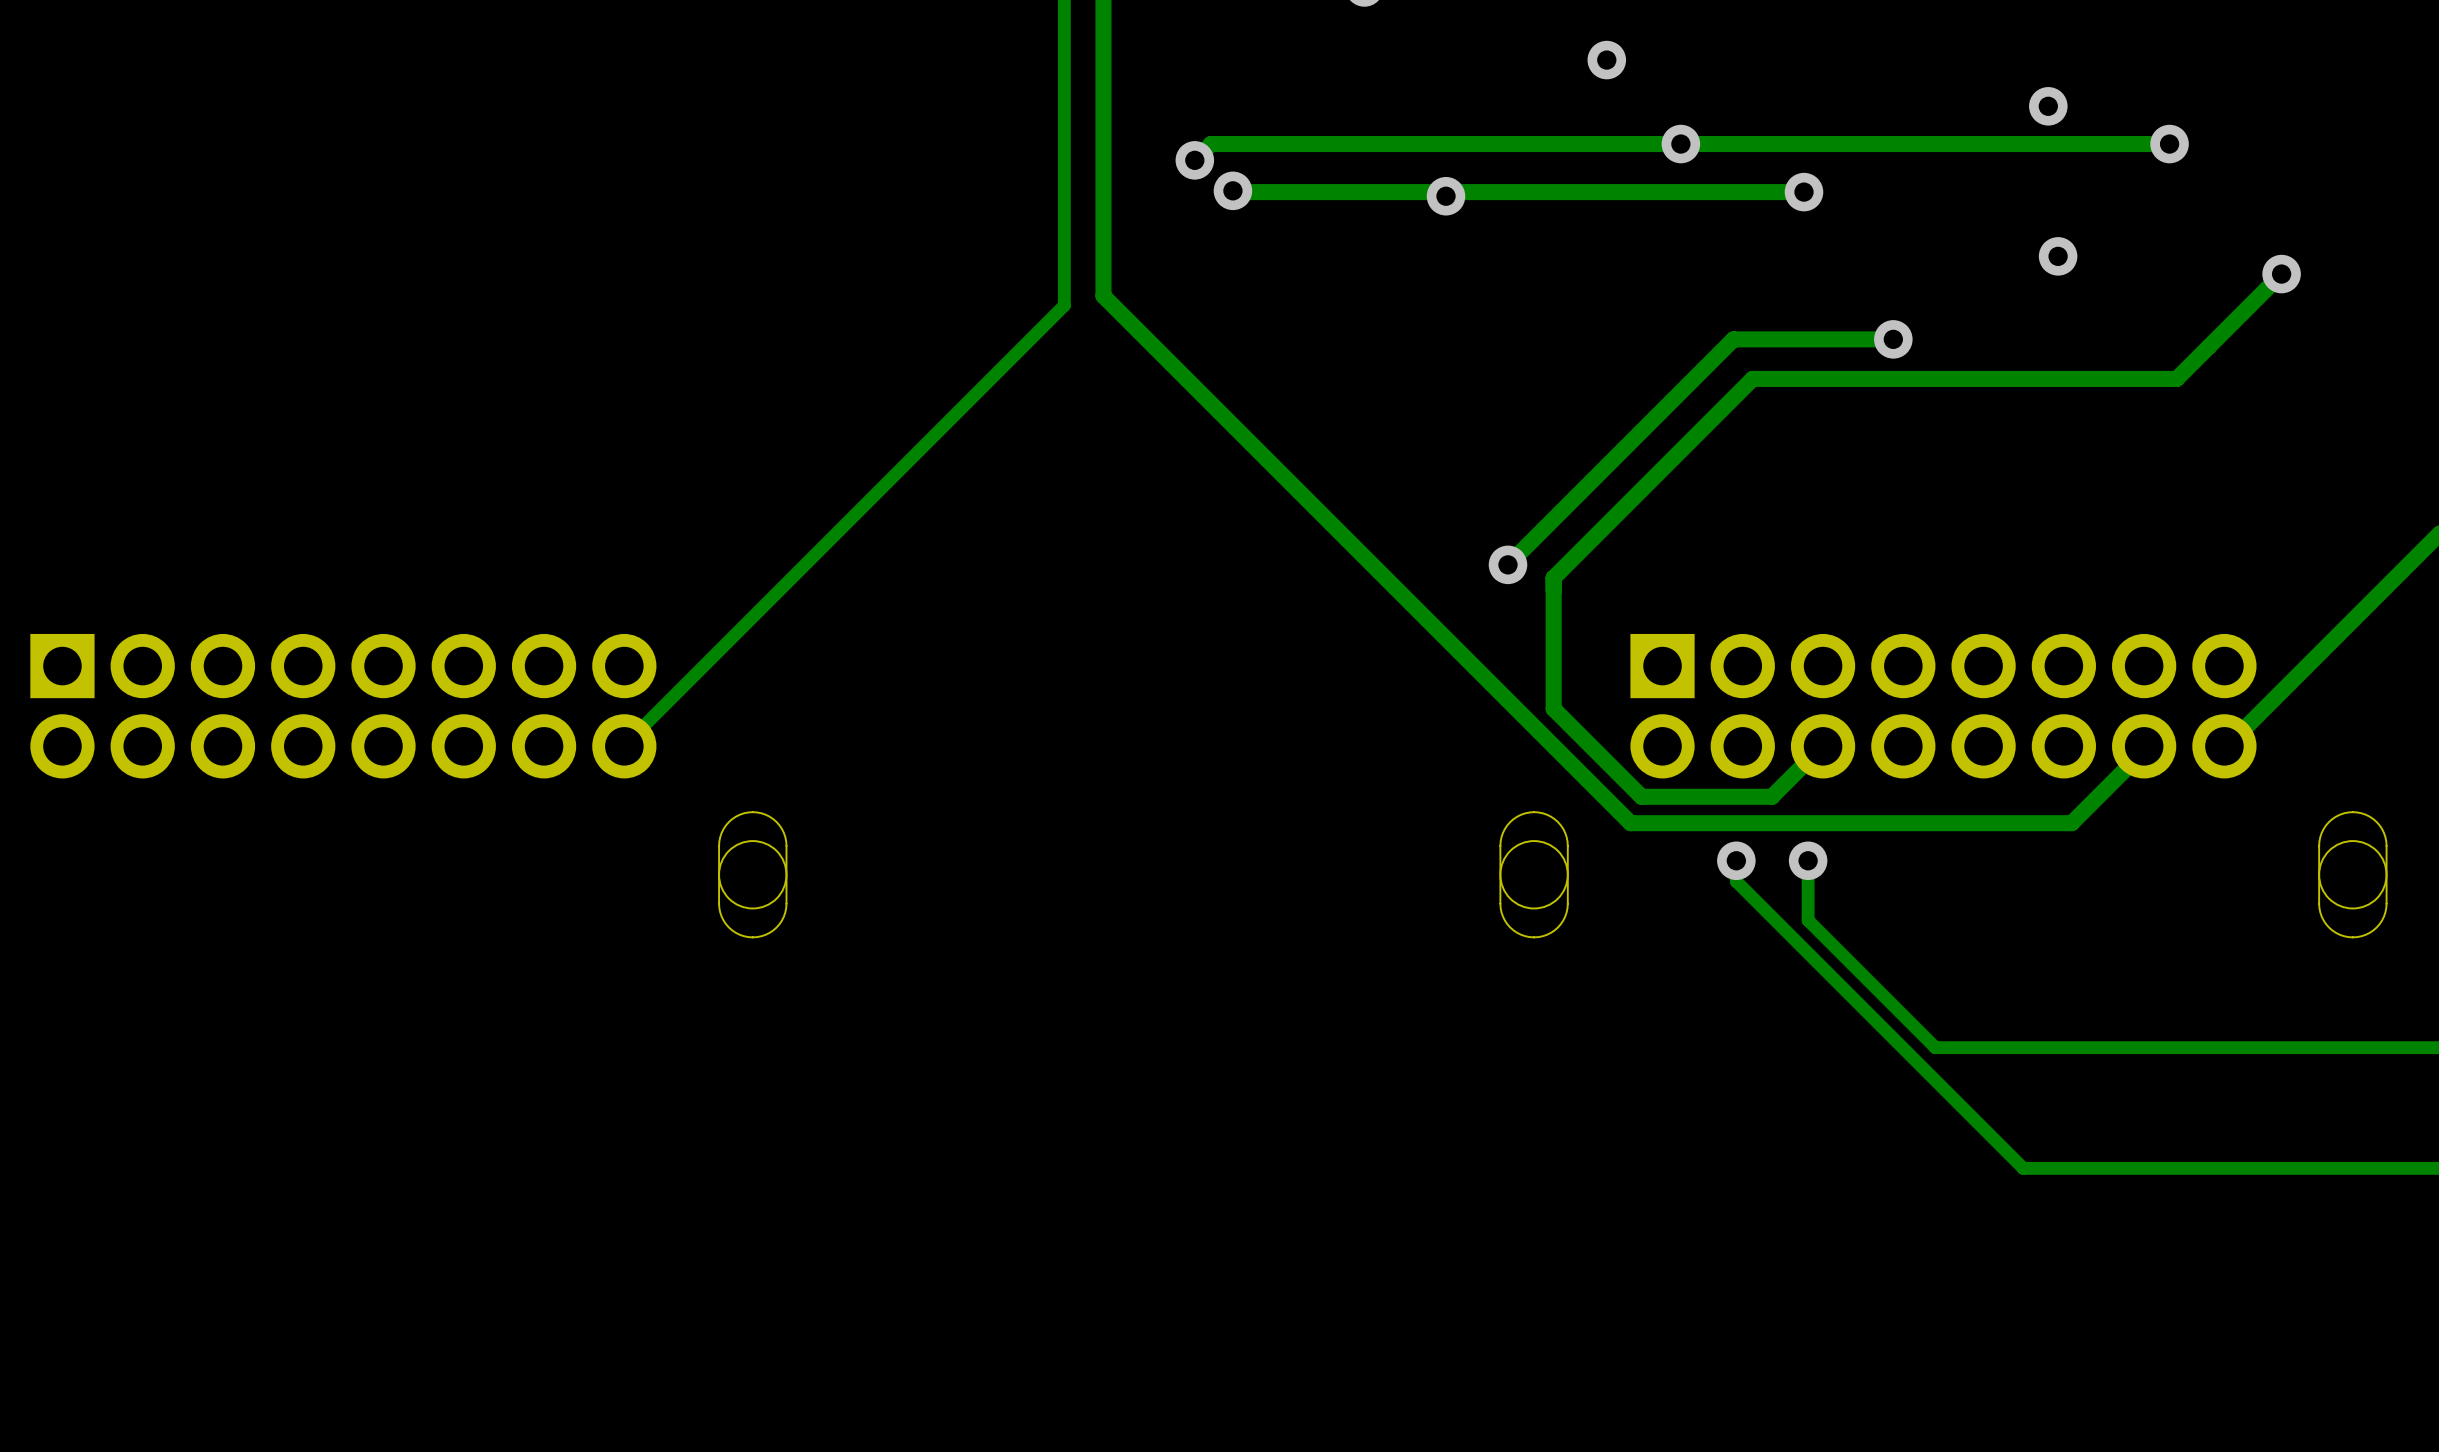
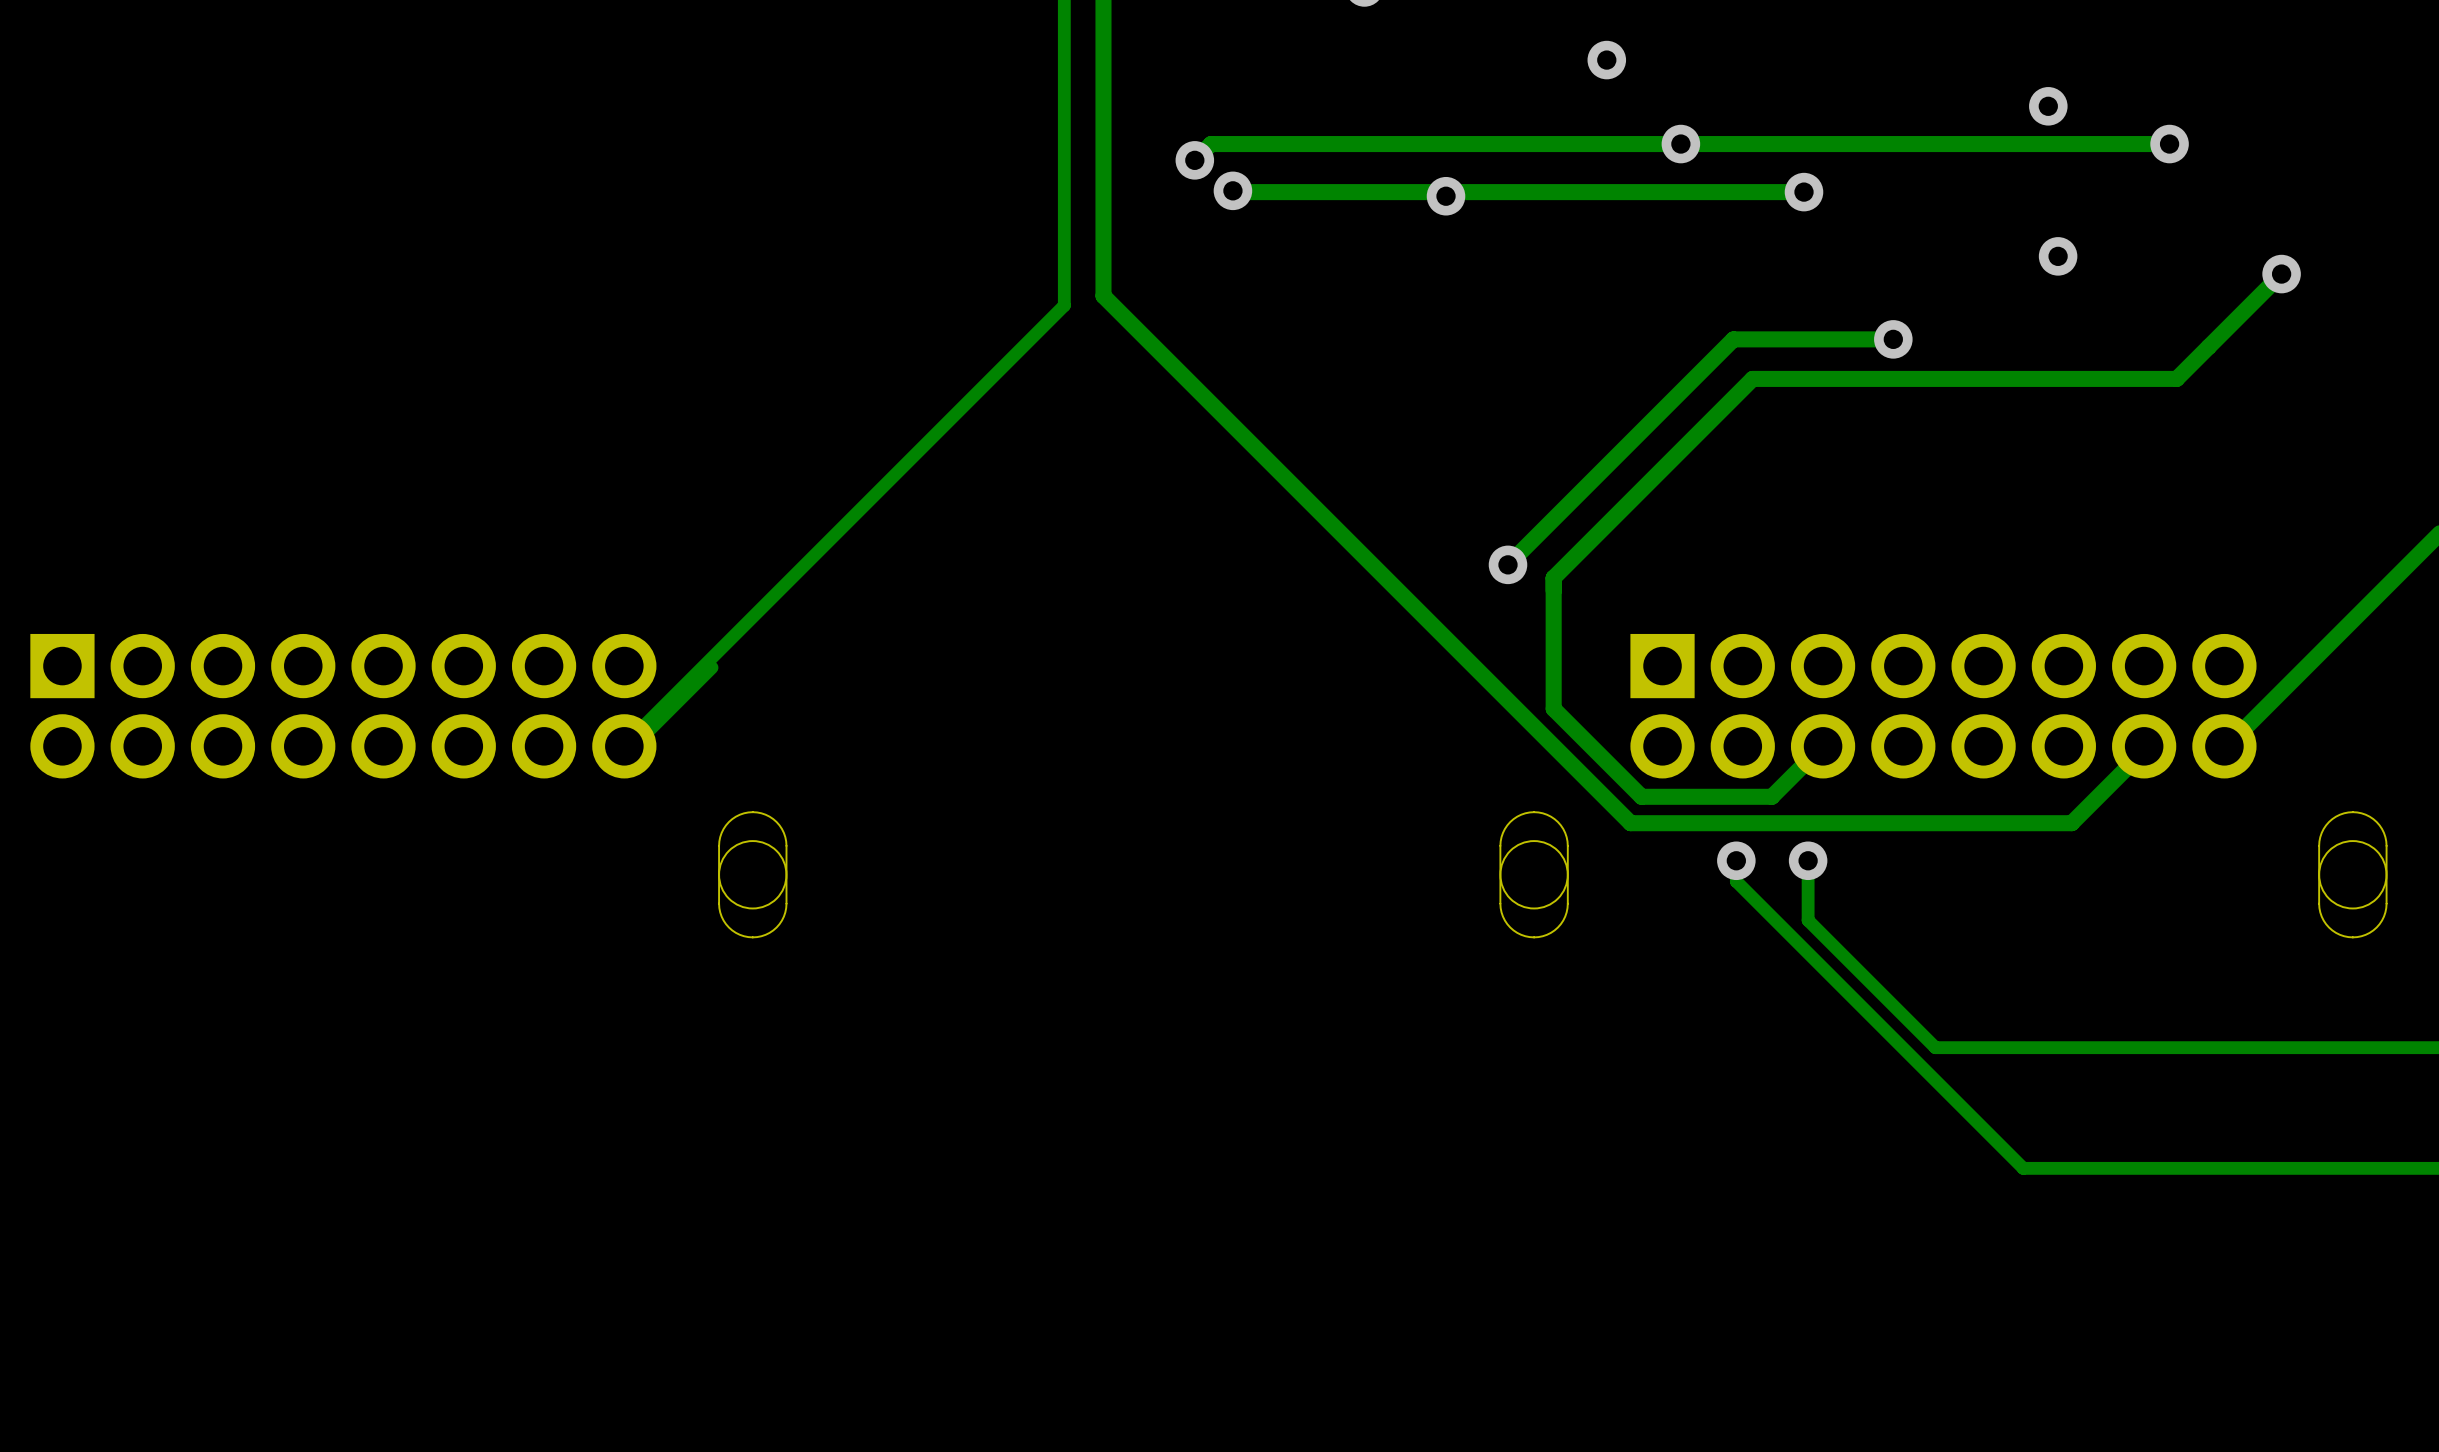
track: none -> (712, 667) (628, 750)

